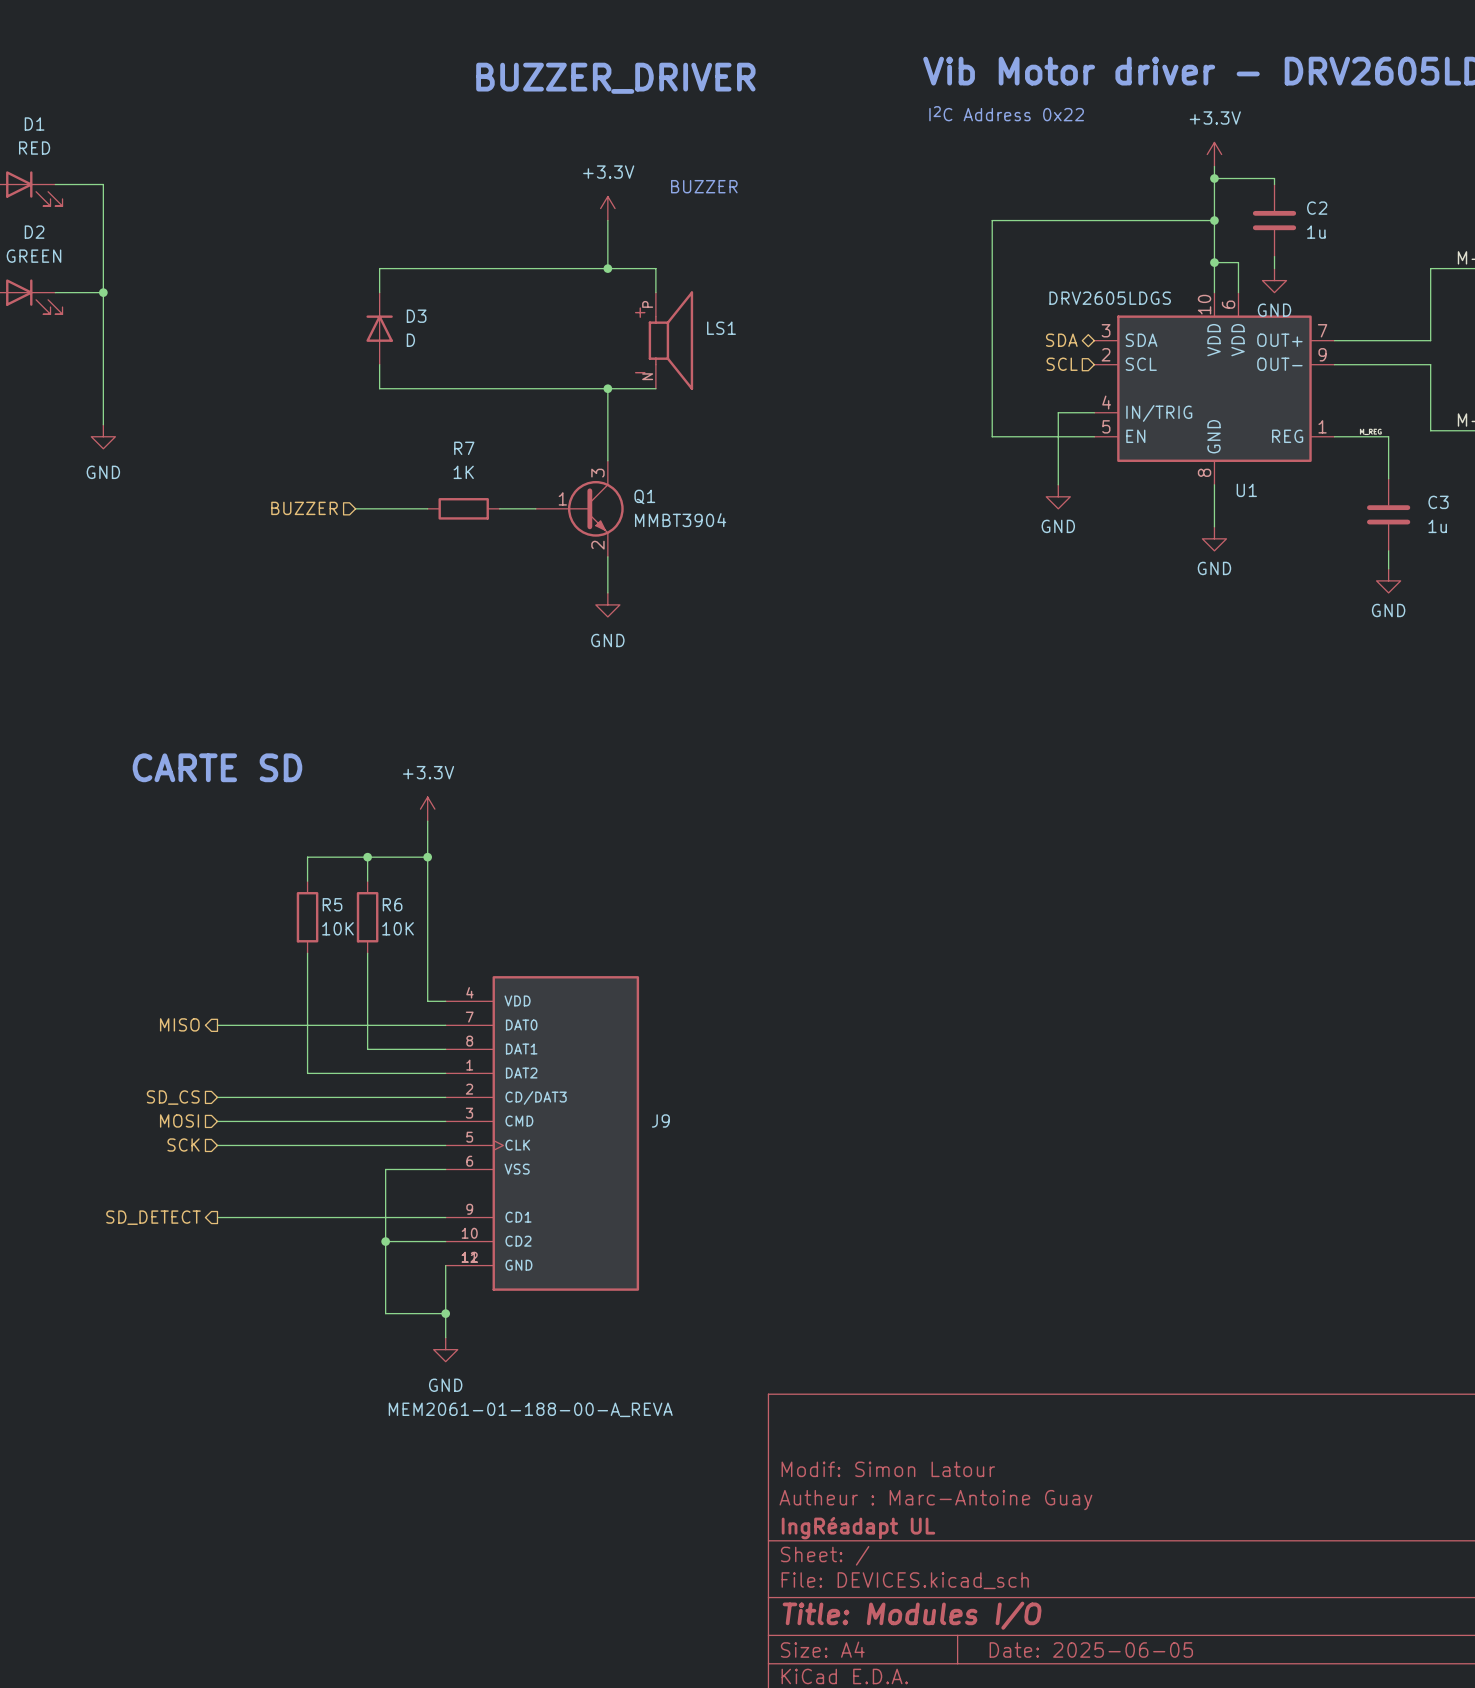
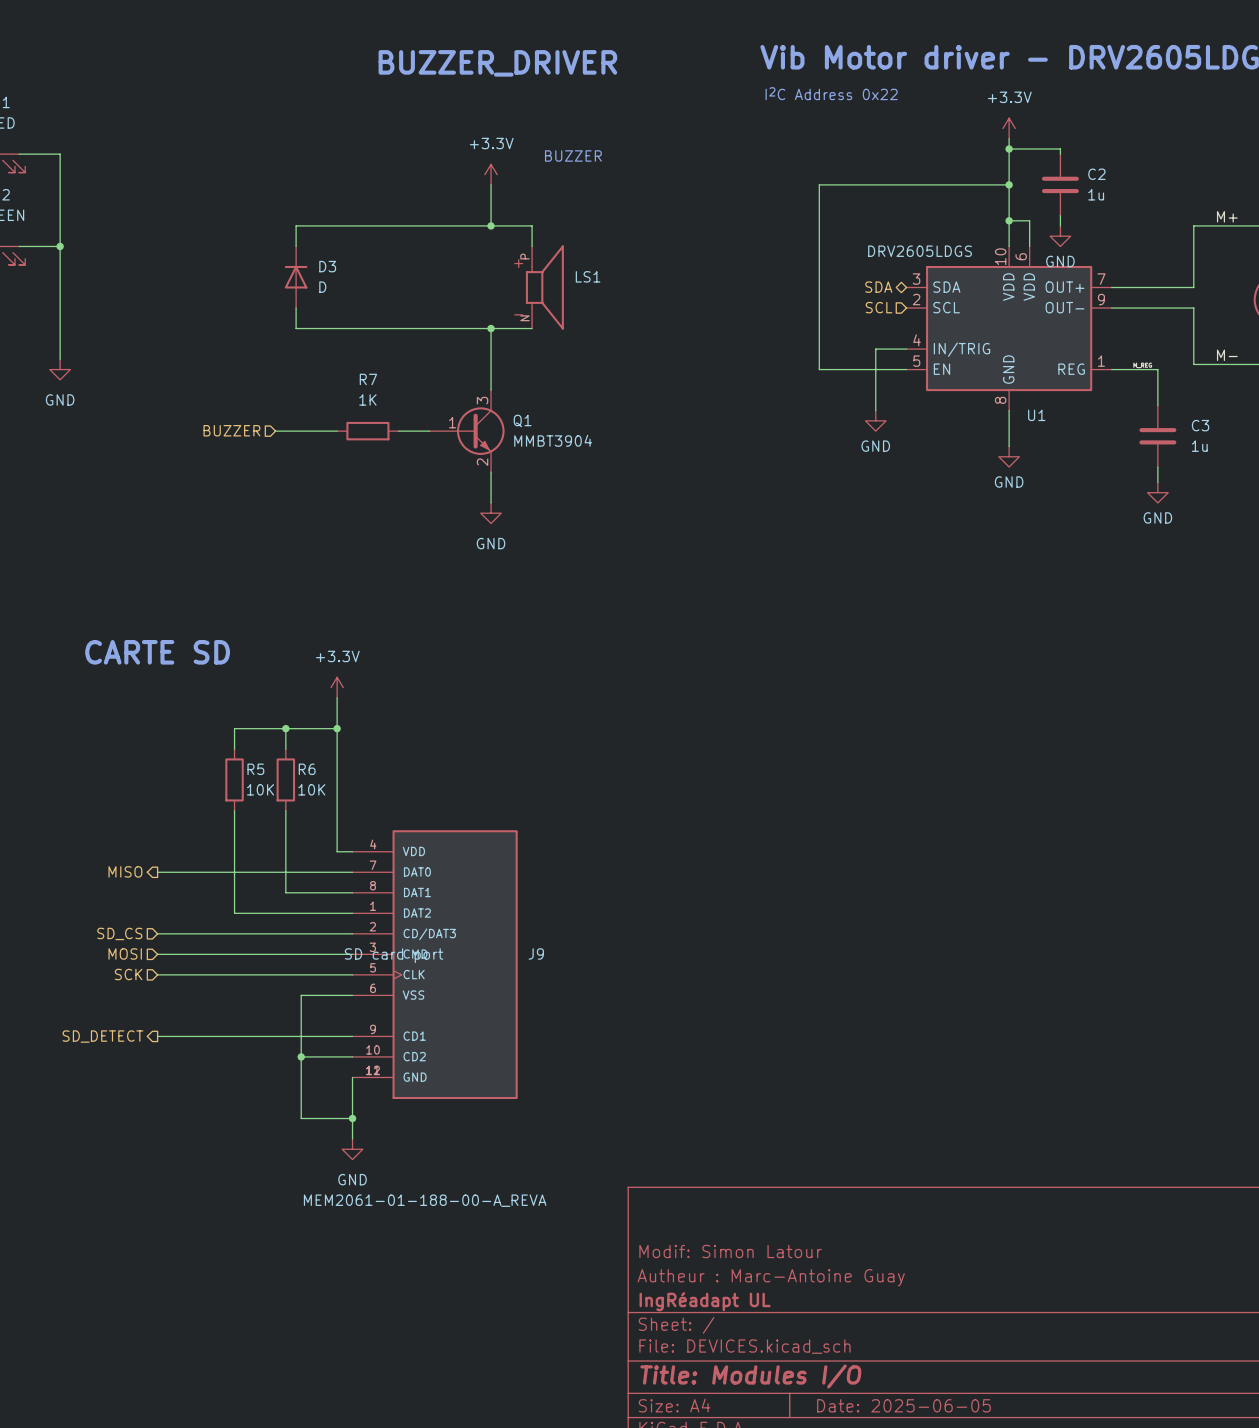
J9 text: none -> SD card port (394, 955)

